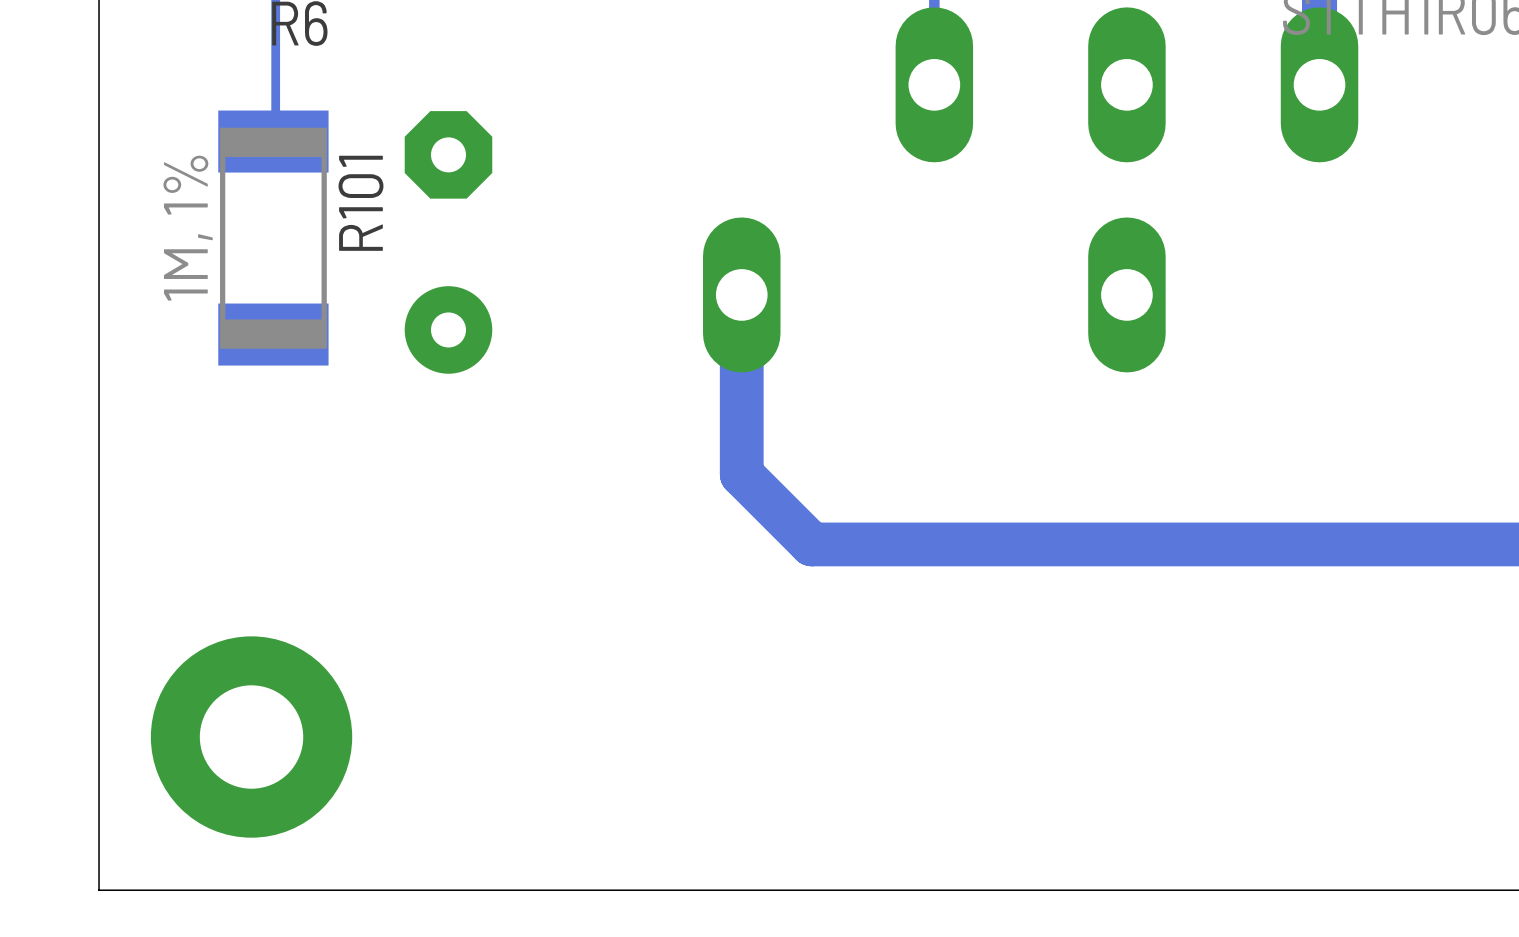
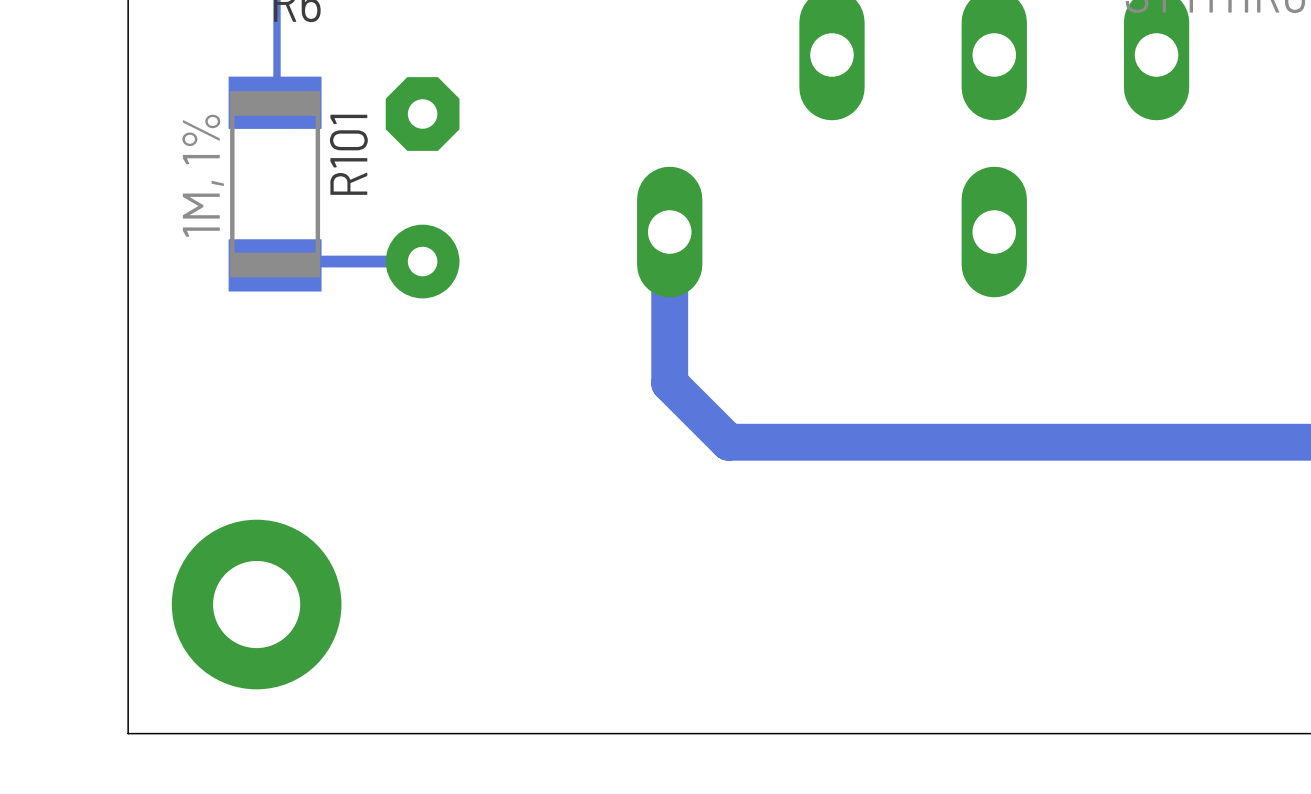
track: none -> (422, 261) (278, 261) (275, 265)

